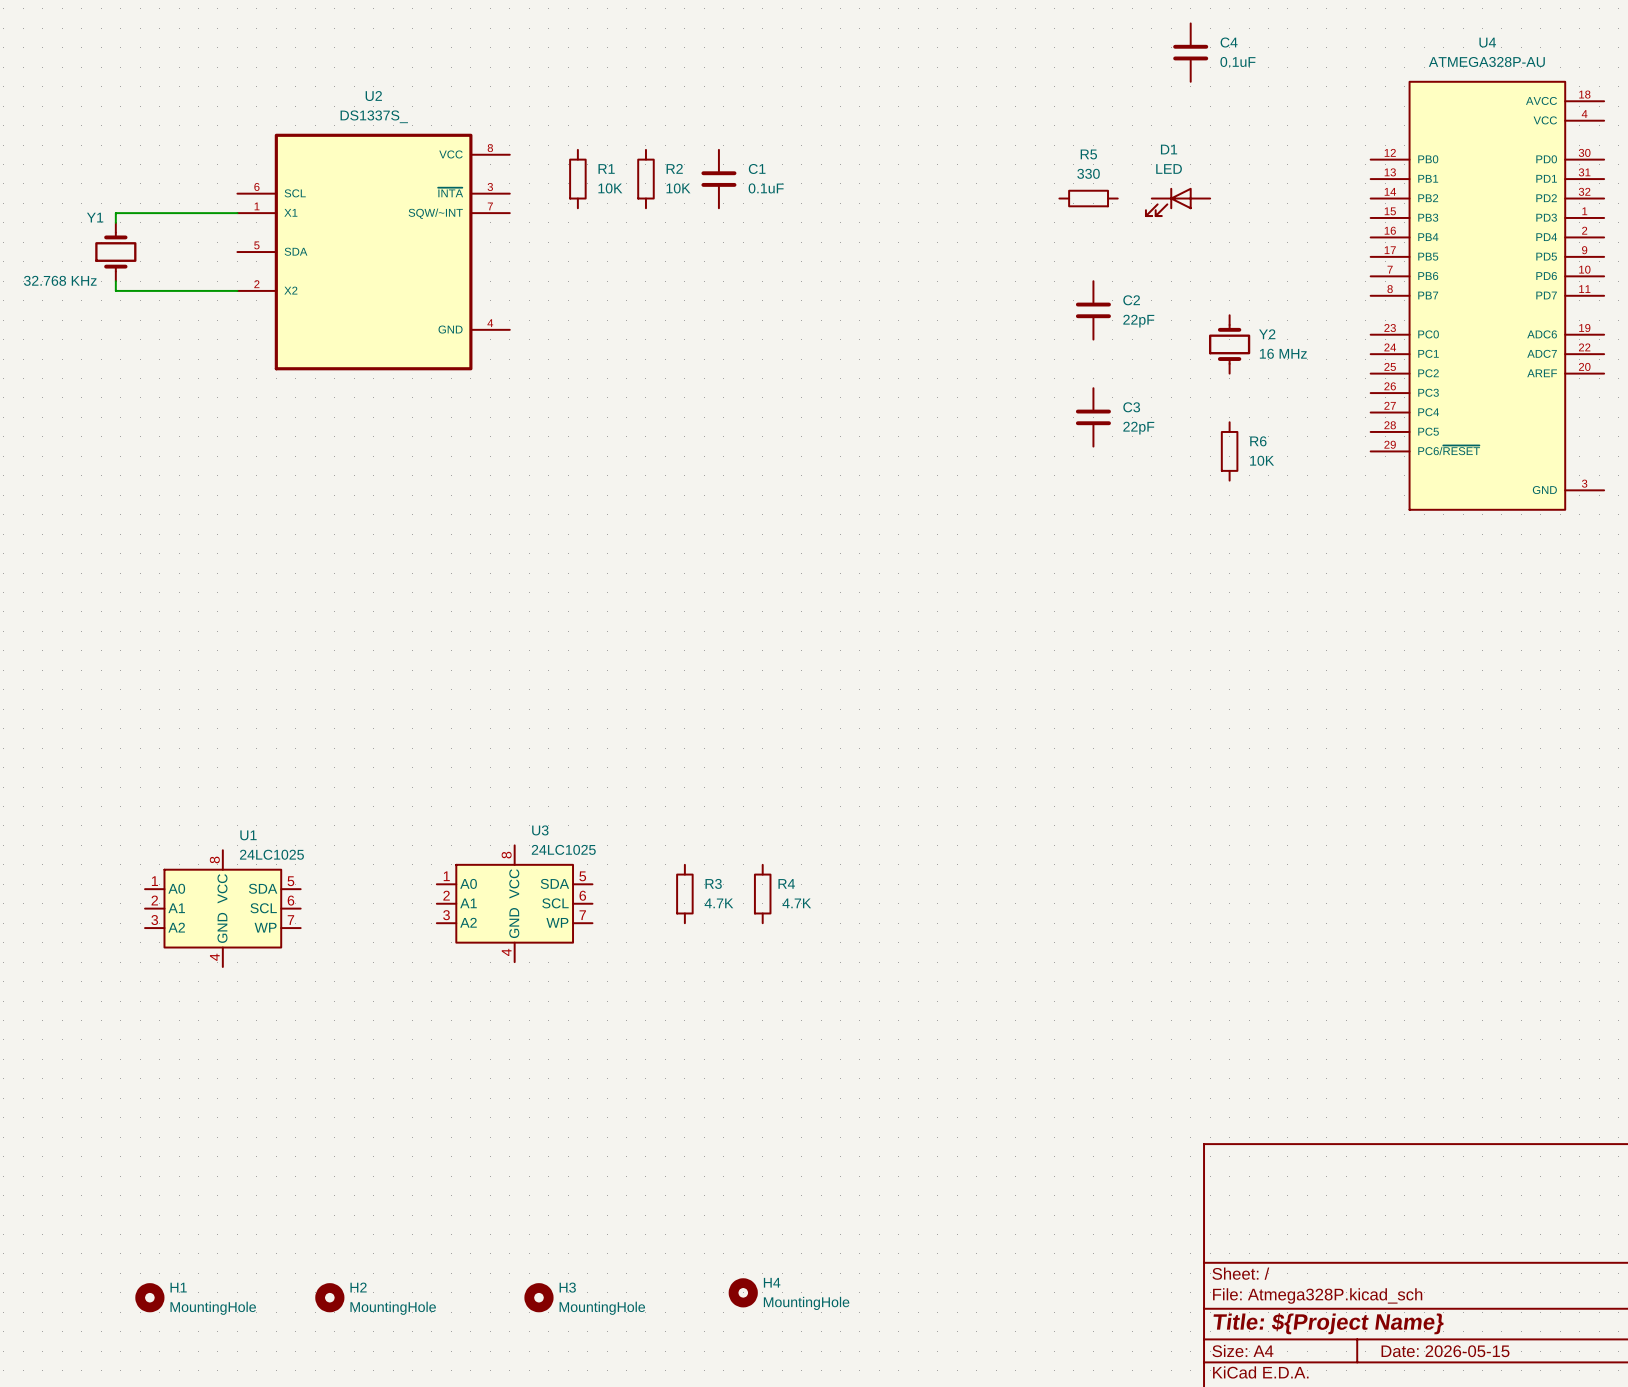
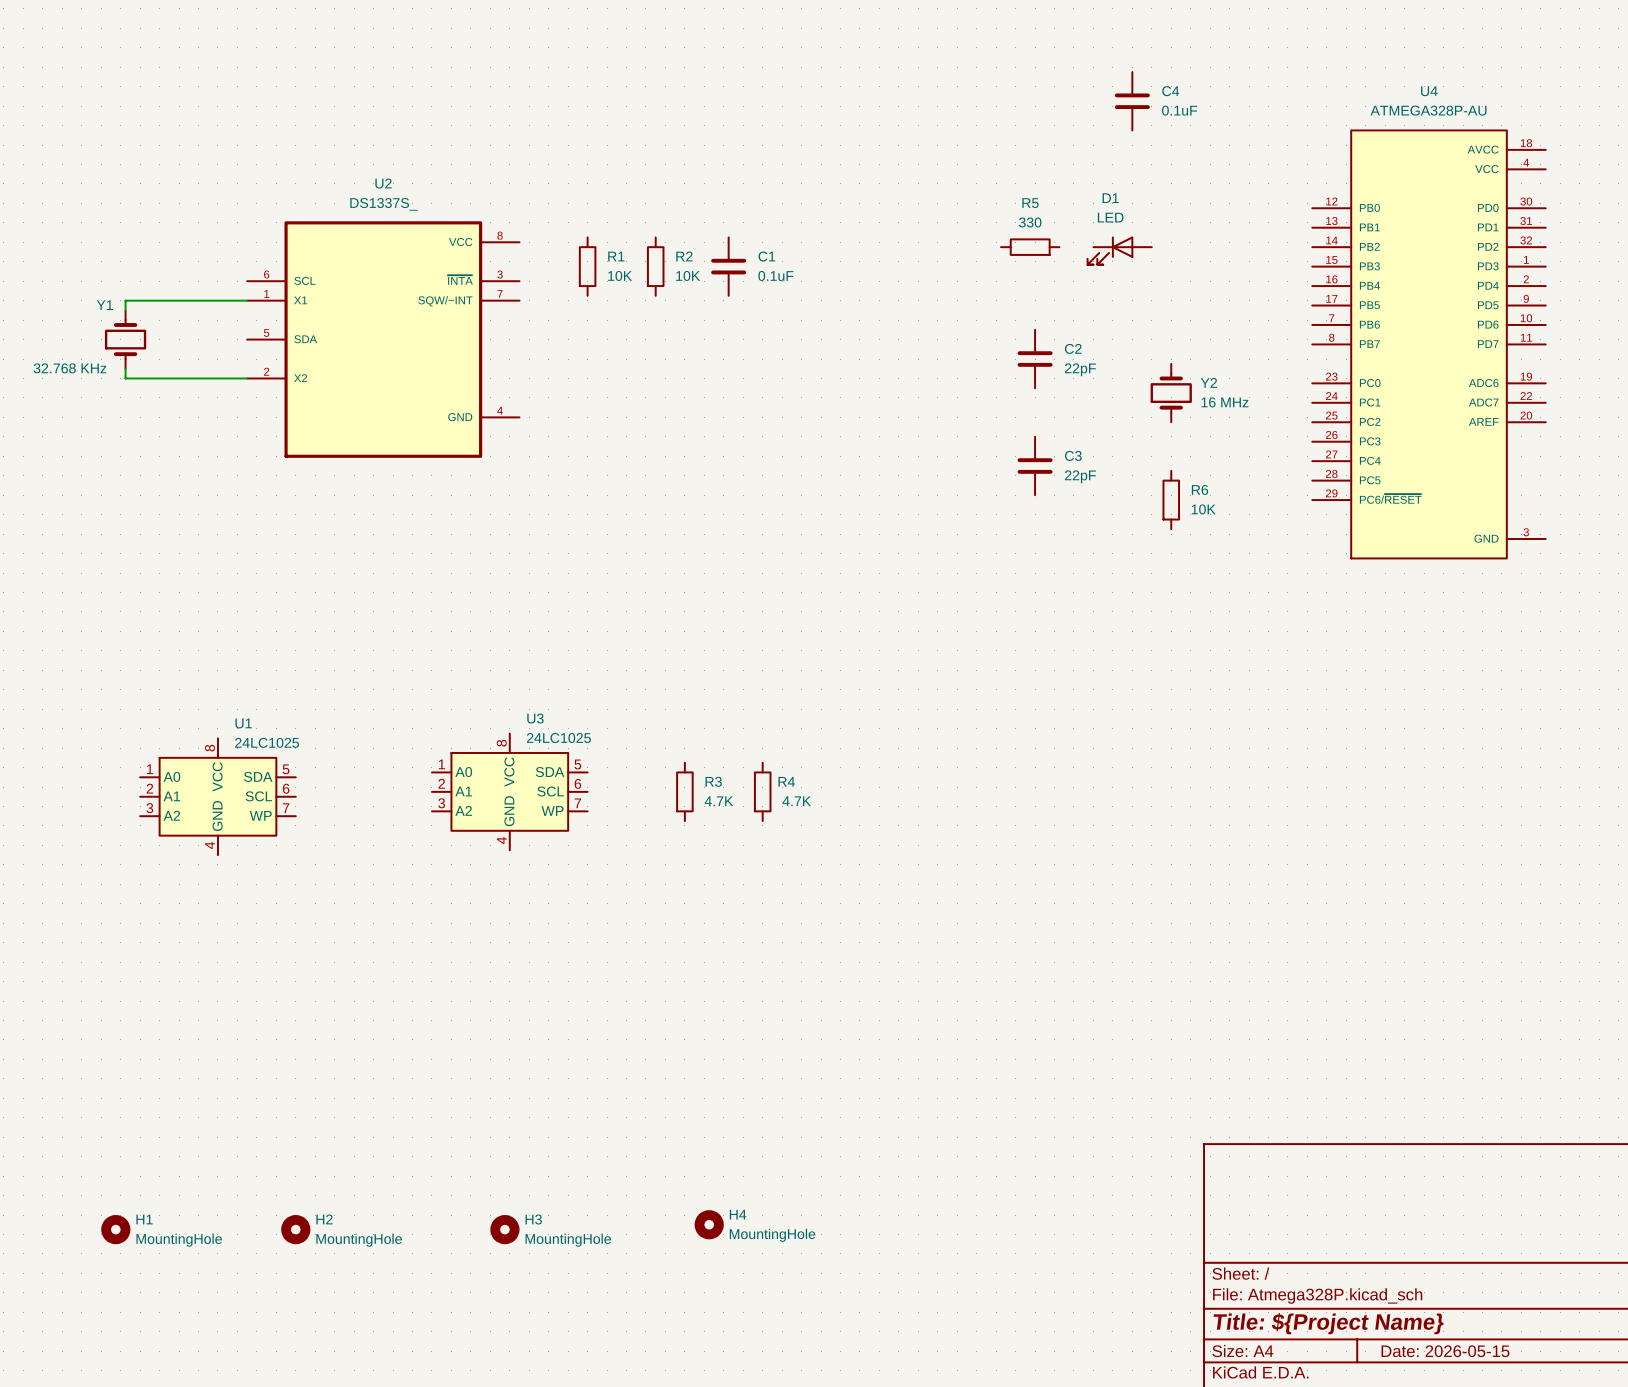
C4 position: (1190, 52) -> (1132, 101)
R1 position: (577, 179) -> (587, 266)
R2 position: (645, 179) -> (655, 266)
C1 position: (718, 179) -> (728, 266)
R5 position: (1088, 198) -> (1030, 247)
D1 position: (1178, 201) -> (1119, 250)
wire: (237, 213) (115, 213) (115, 222) -> (247, 300) (125, 300) (125, 310)
Y1 position: (115, 252) -> (125, 339)
U2 position: (373, 252) -> (383, 339)
wire: (115, 281) (115, 290) (237, 290) -> (125, 368) (125, 378) (247, 378)
U4 position: (1487, 295) -> (1429, 344)
C2 position: (1093, 310) -> (1035, 359)
Y2 position: (1229, 344) -> (1171, 393)
C3 position: (1093, 417) -> (1035, 466)
R6 position: (1229, 451) -> (1171, 500)
R3 position: (684, 894) -> (684, 791)
R4 position: (762, 894) -> (762, 791)
U3 position: (514, 903) -> (509, 791)
U1 position: (222, 908) -> (217, 796)
H4 position: (743, 1292) -> (709, 1224)
H1 position: (149, 1297) -> (115, 1229)
H2 position: (329, 1297) -> (295, 1229)
H3 position: (538, 1297) -> (504, 1229)

